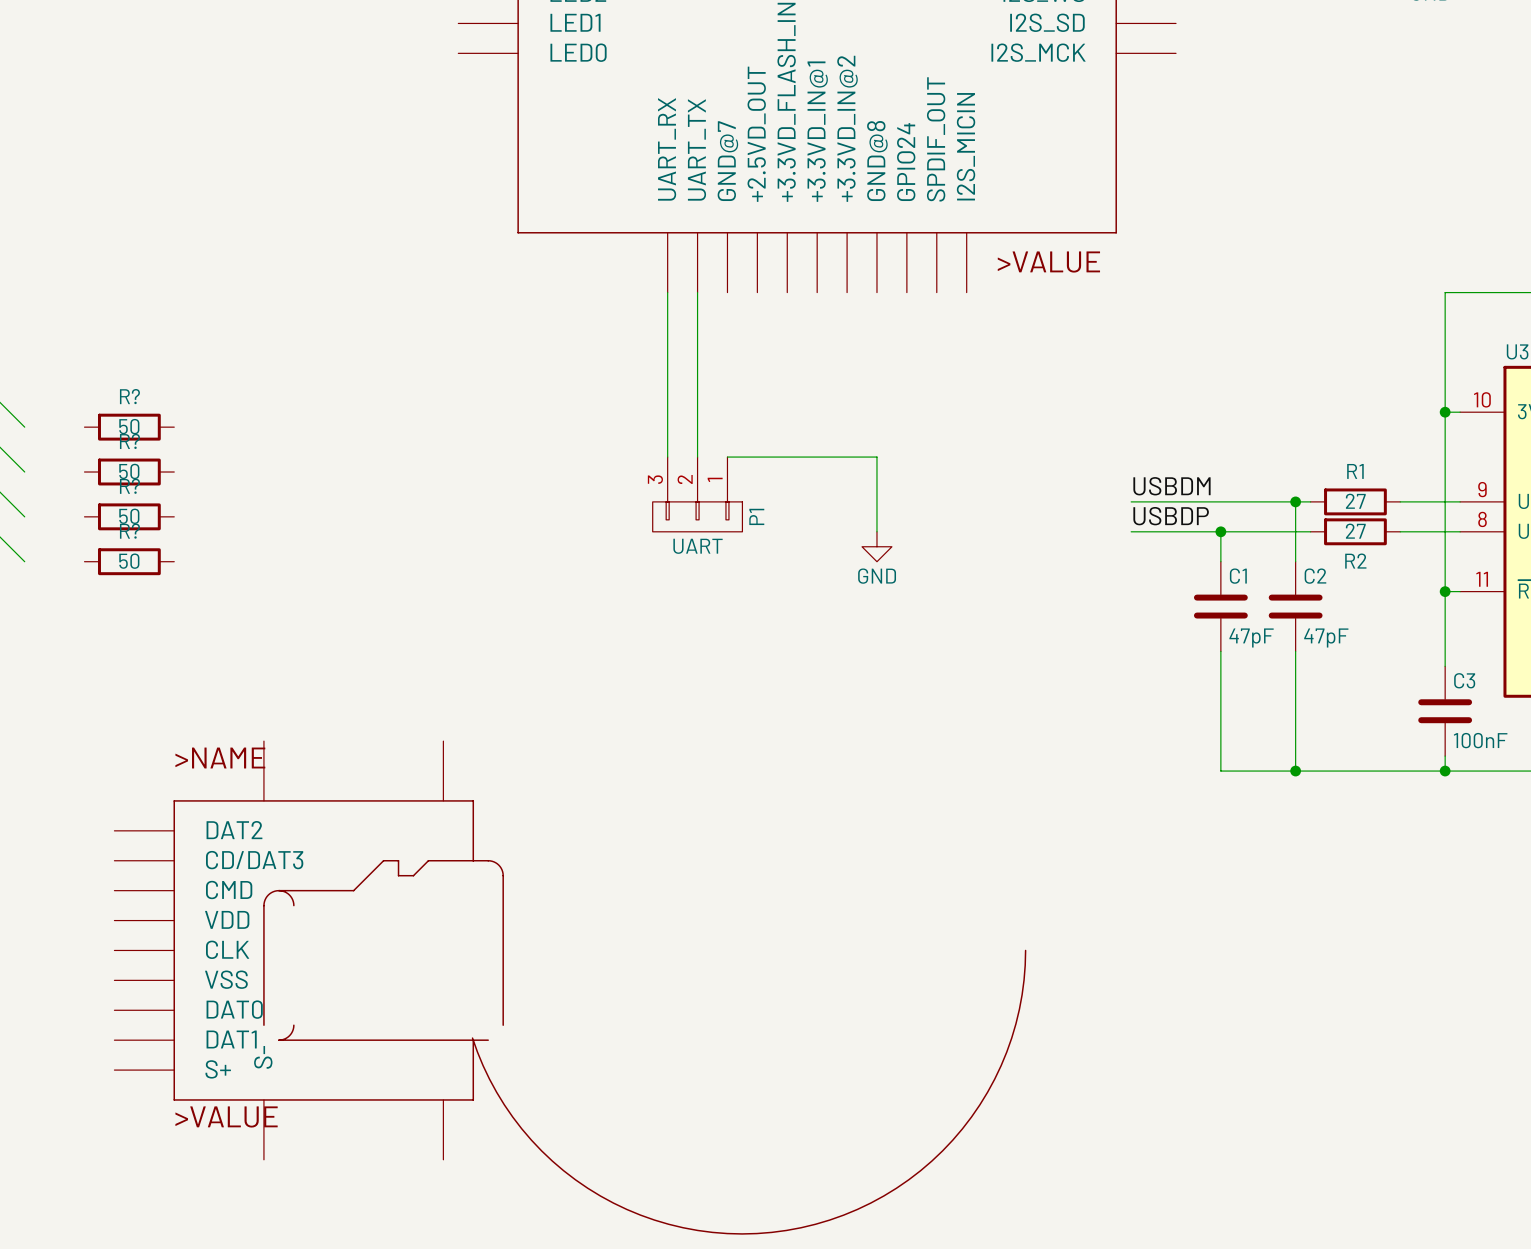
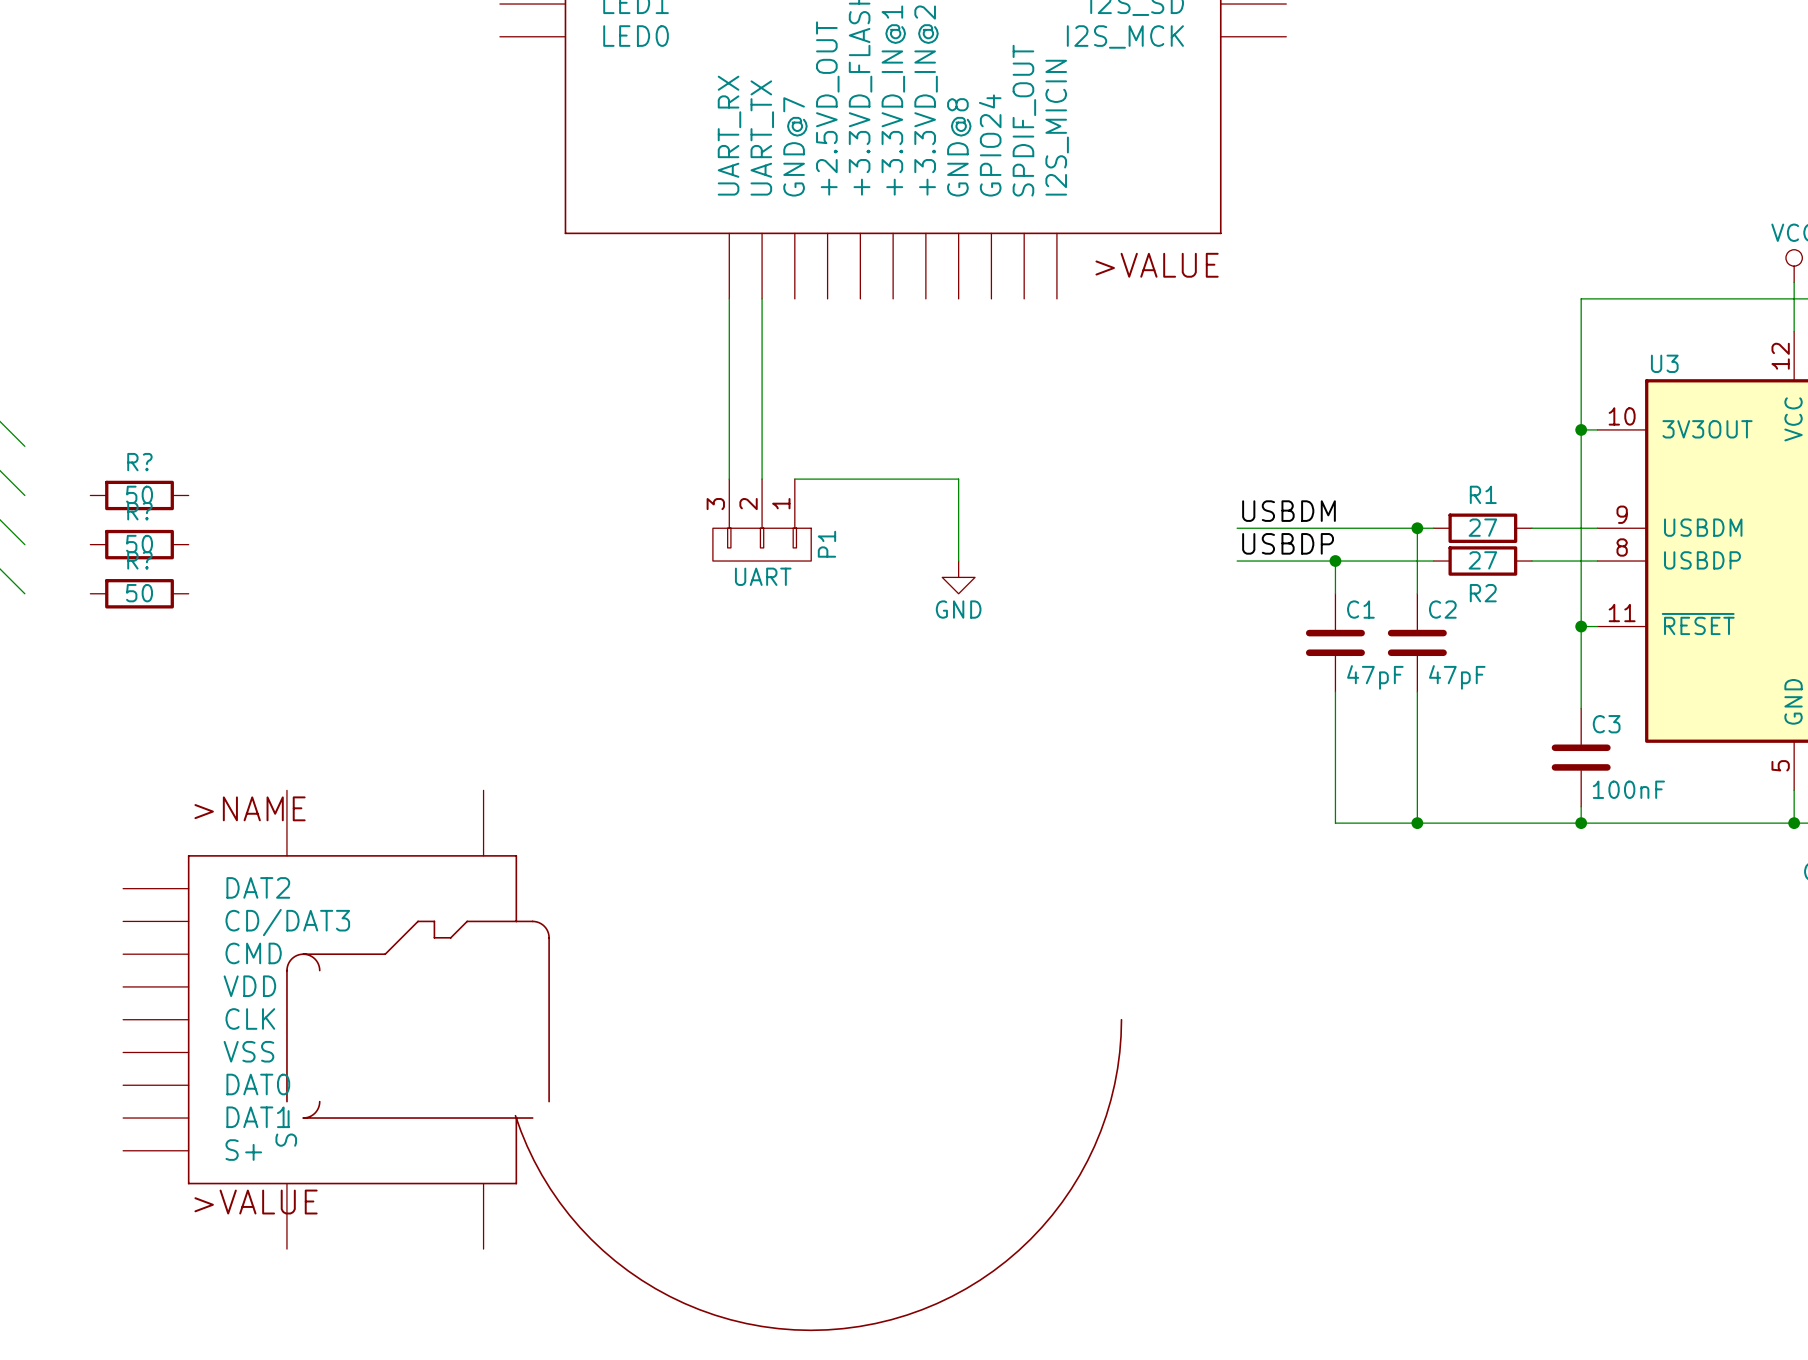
R?: 50 (129, 427) -> none

